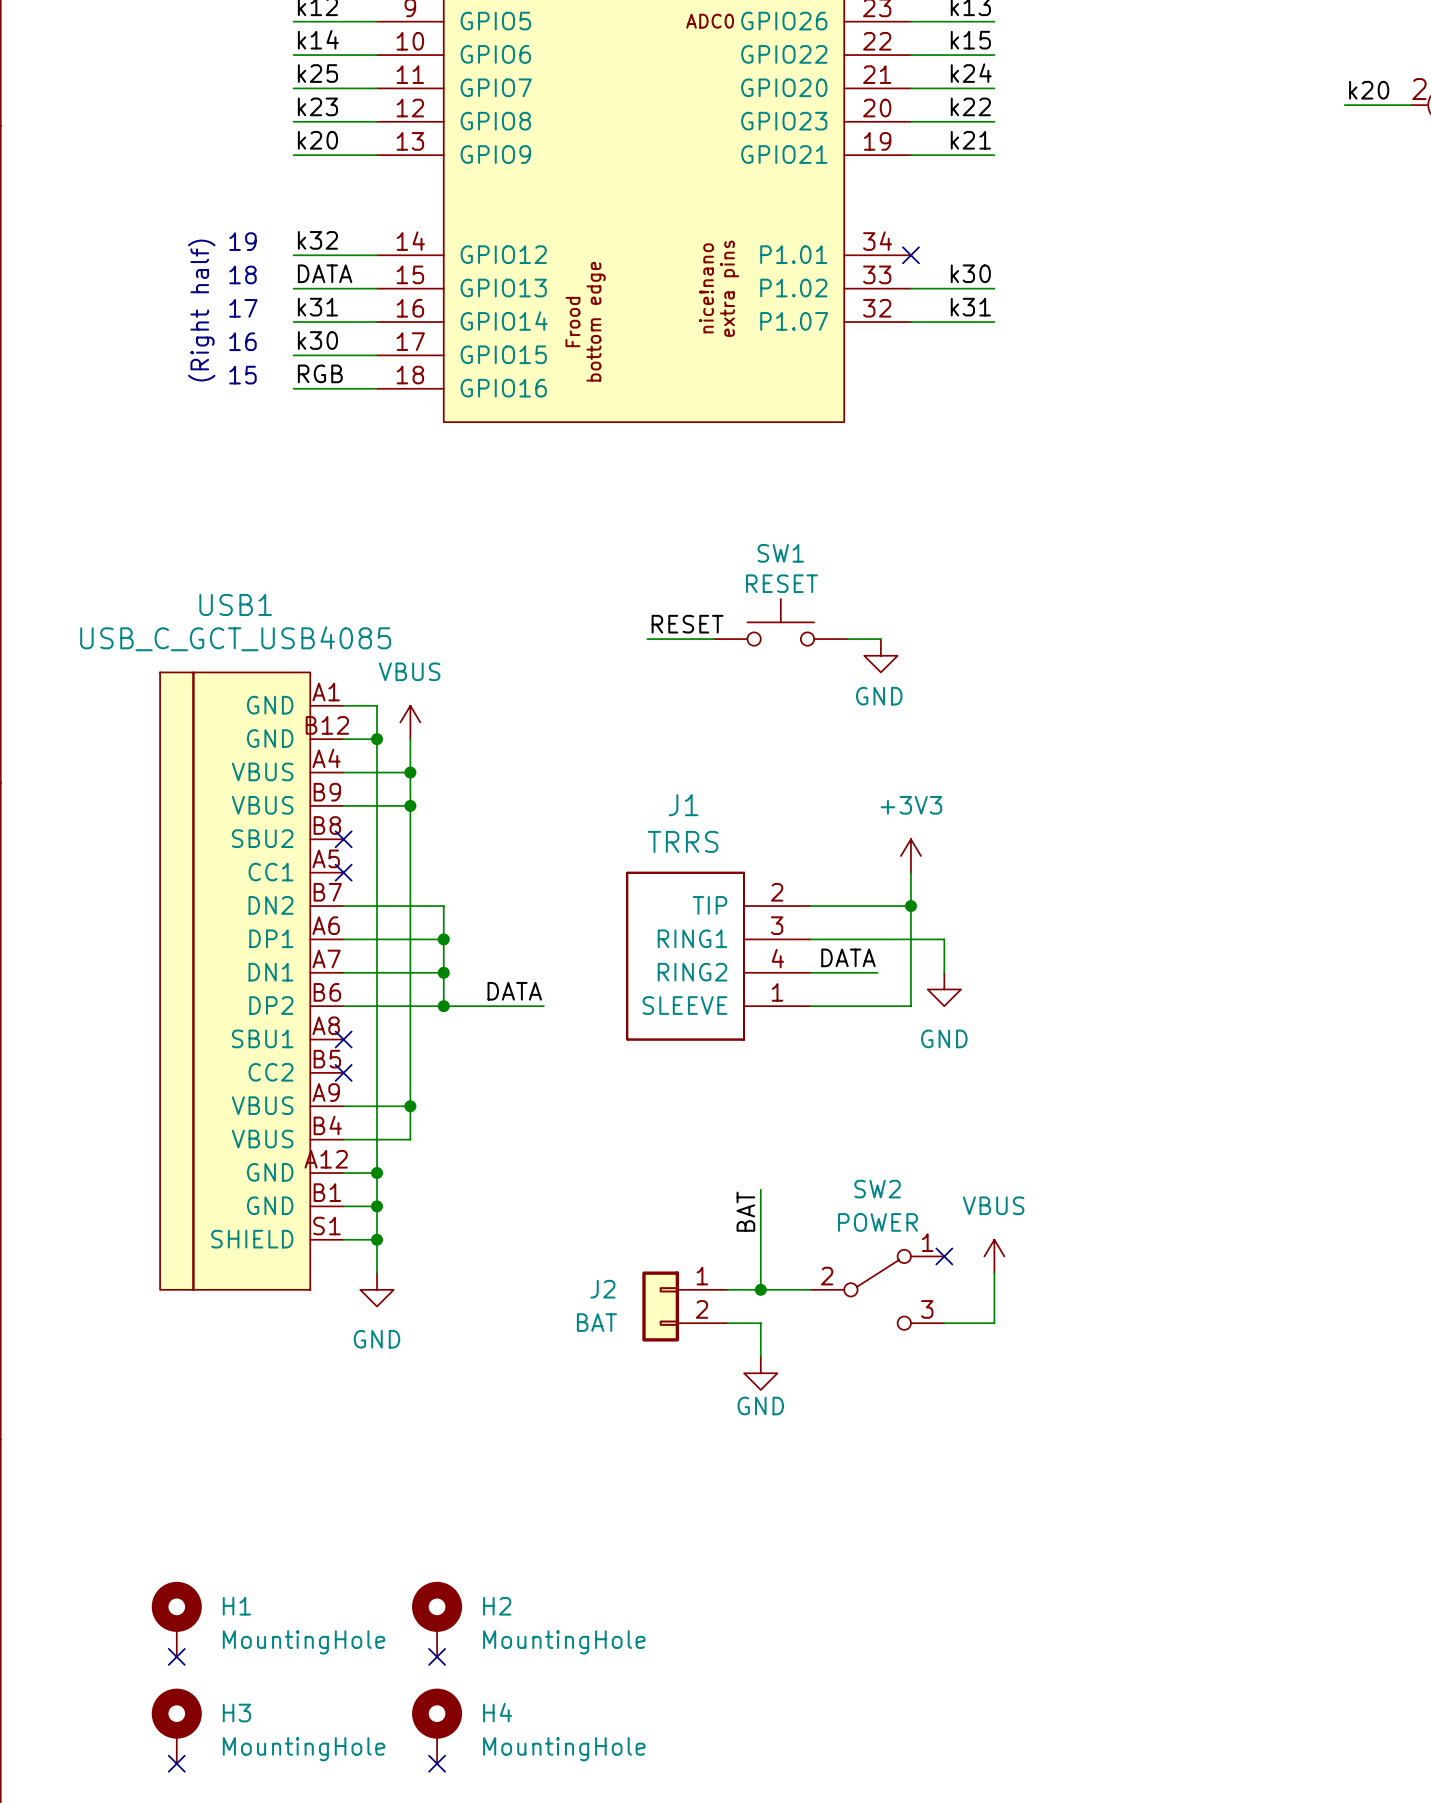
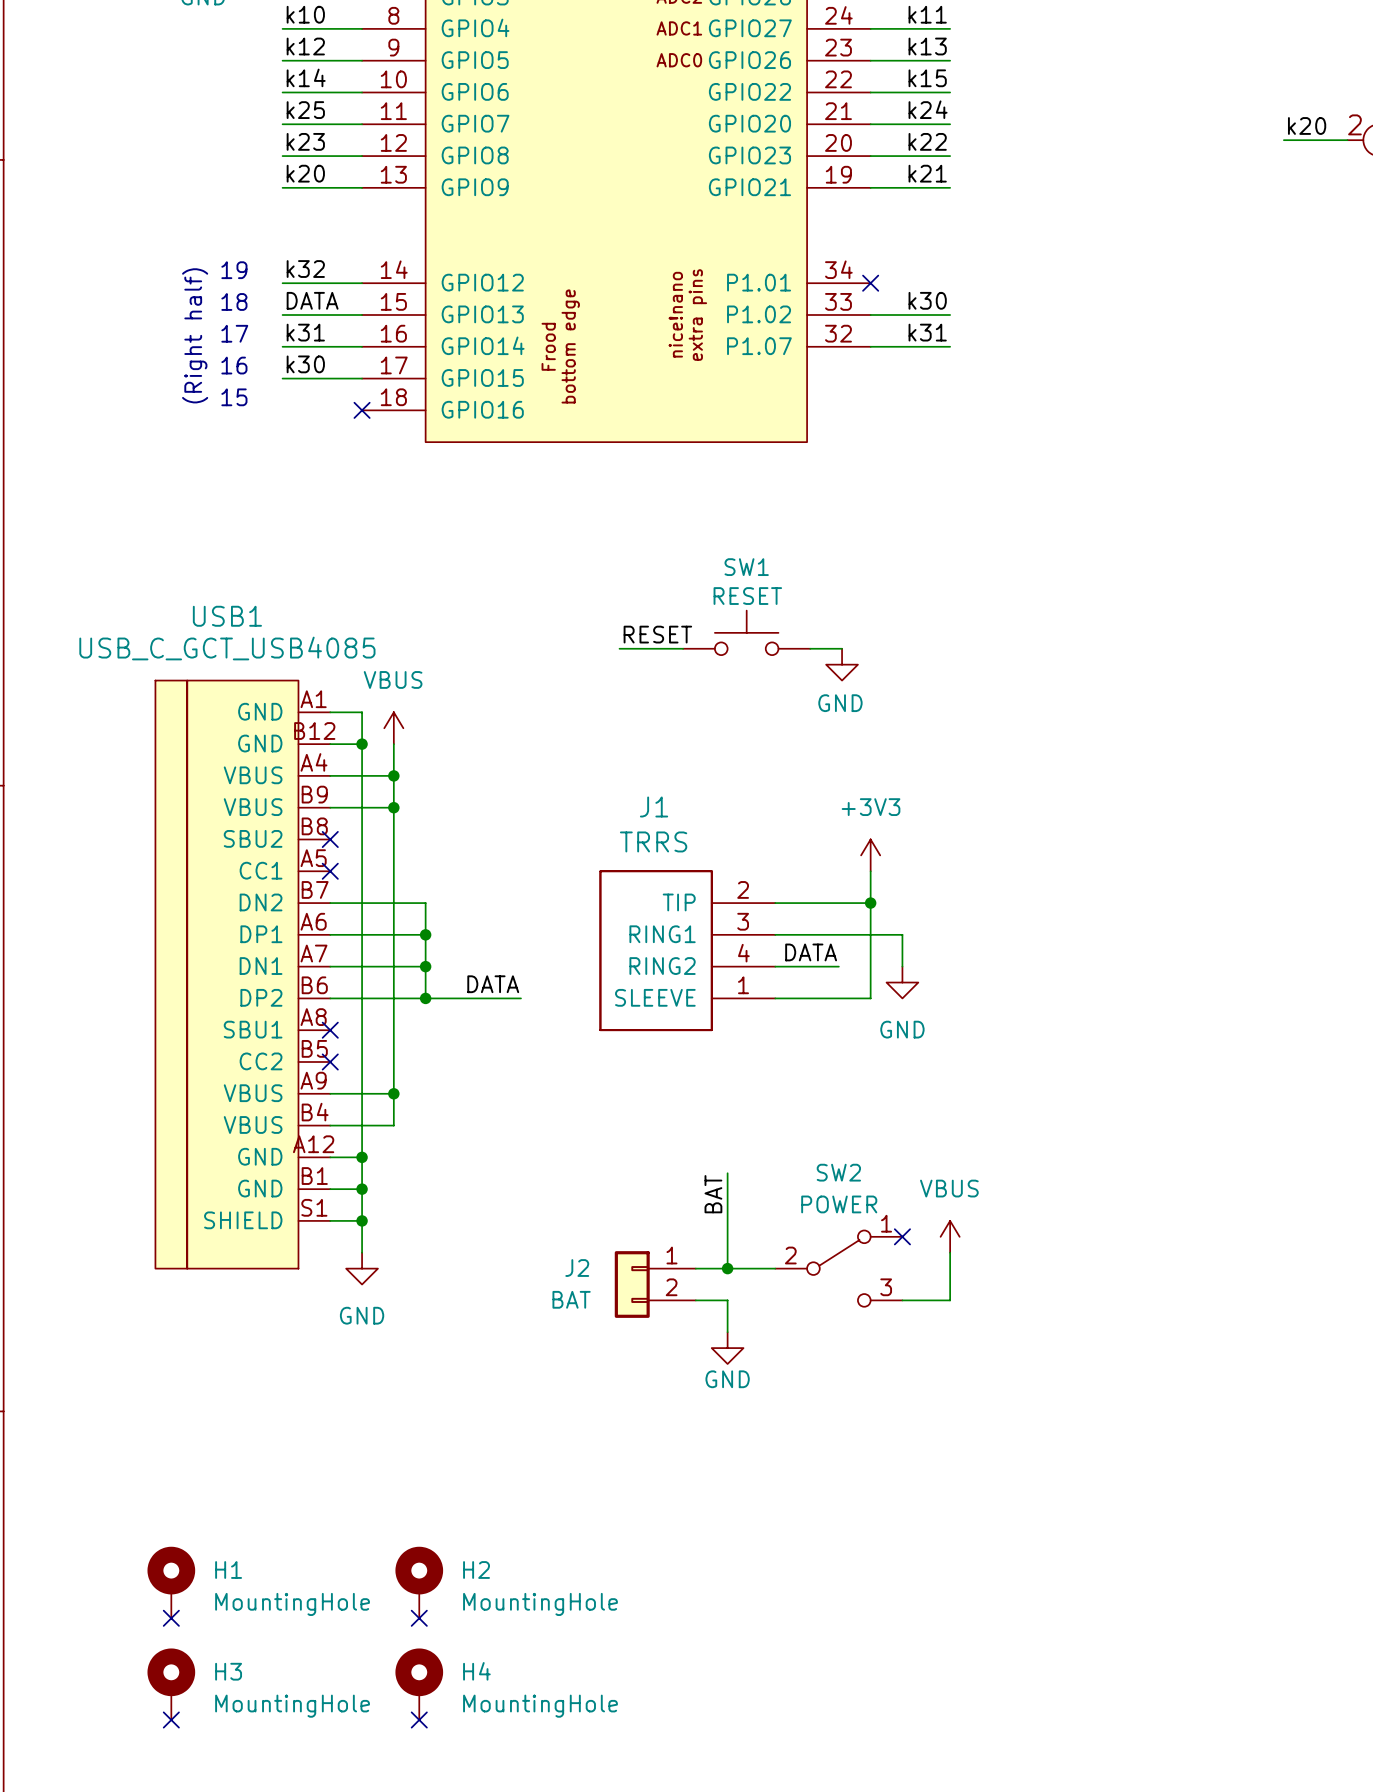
label: RGB (320, 373) -> none
wire: (293, 388) (377, 388) -> none
no-connect mark: none -> (362, 410)

